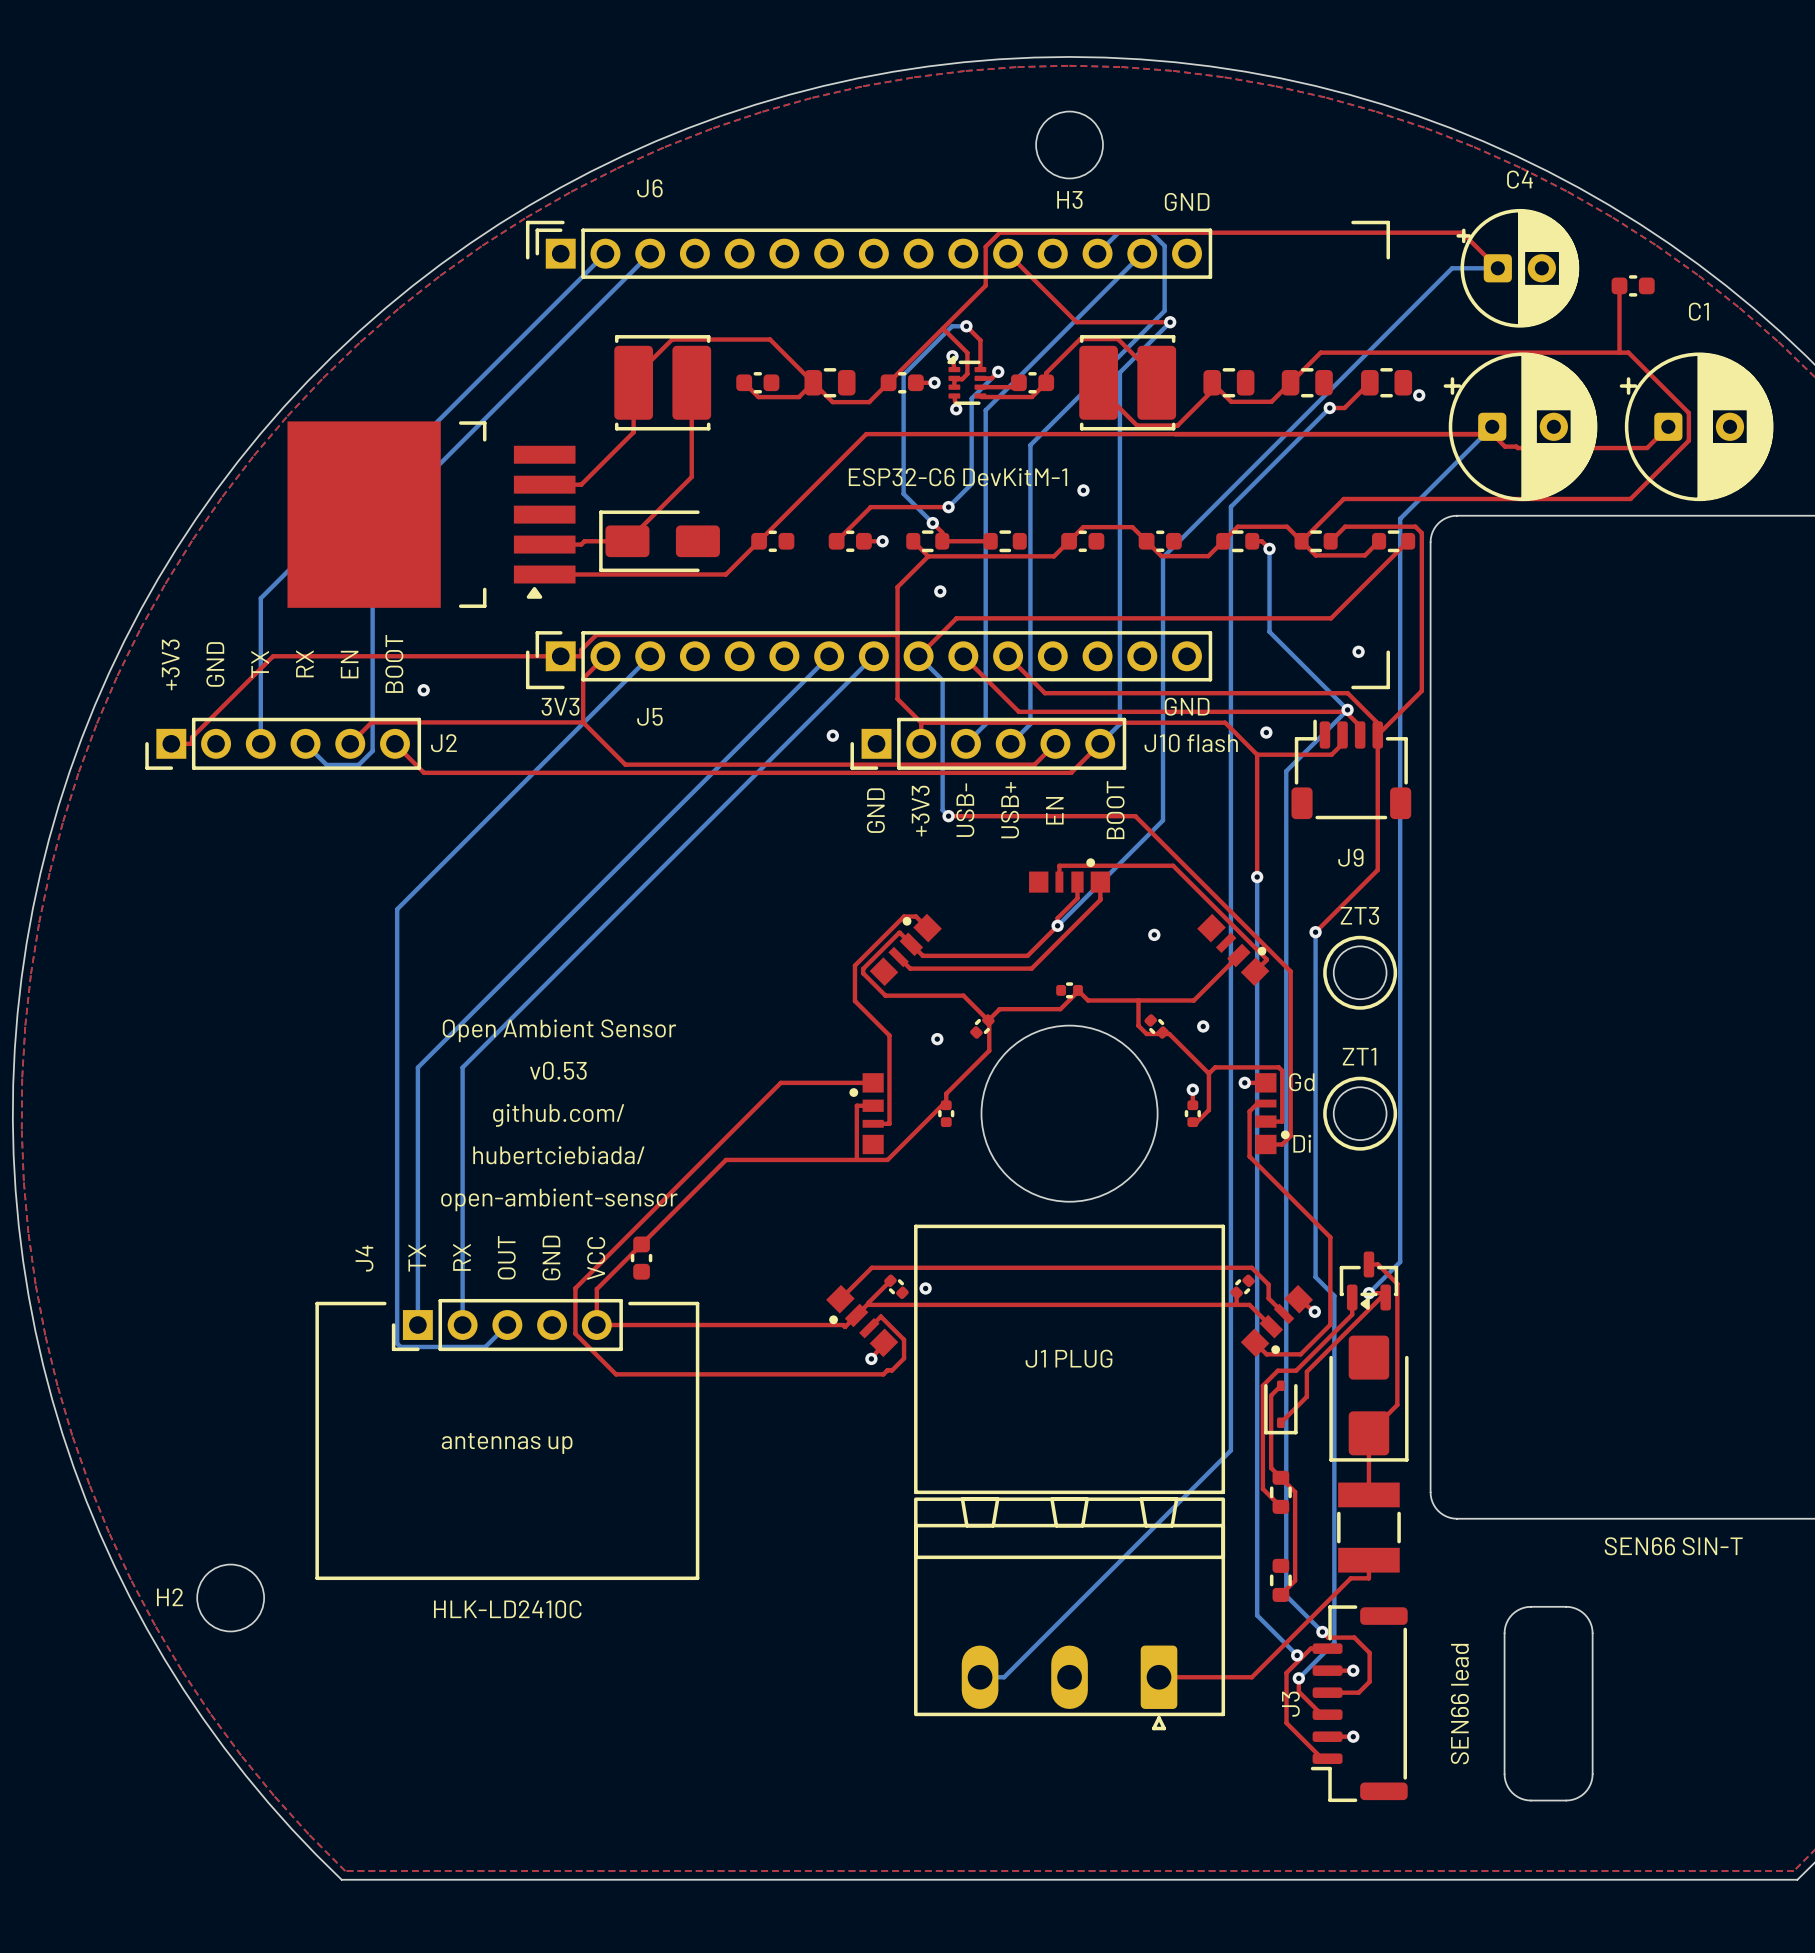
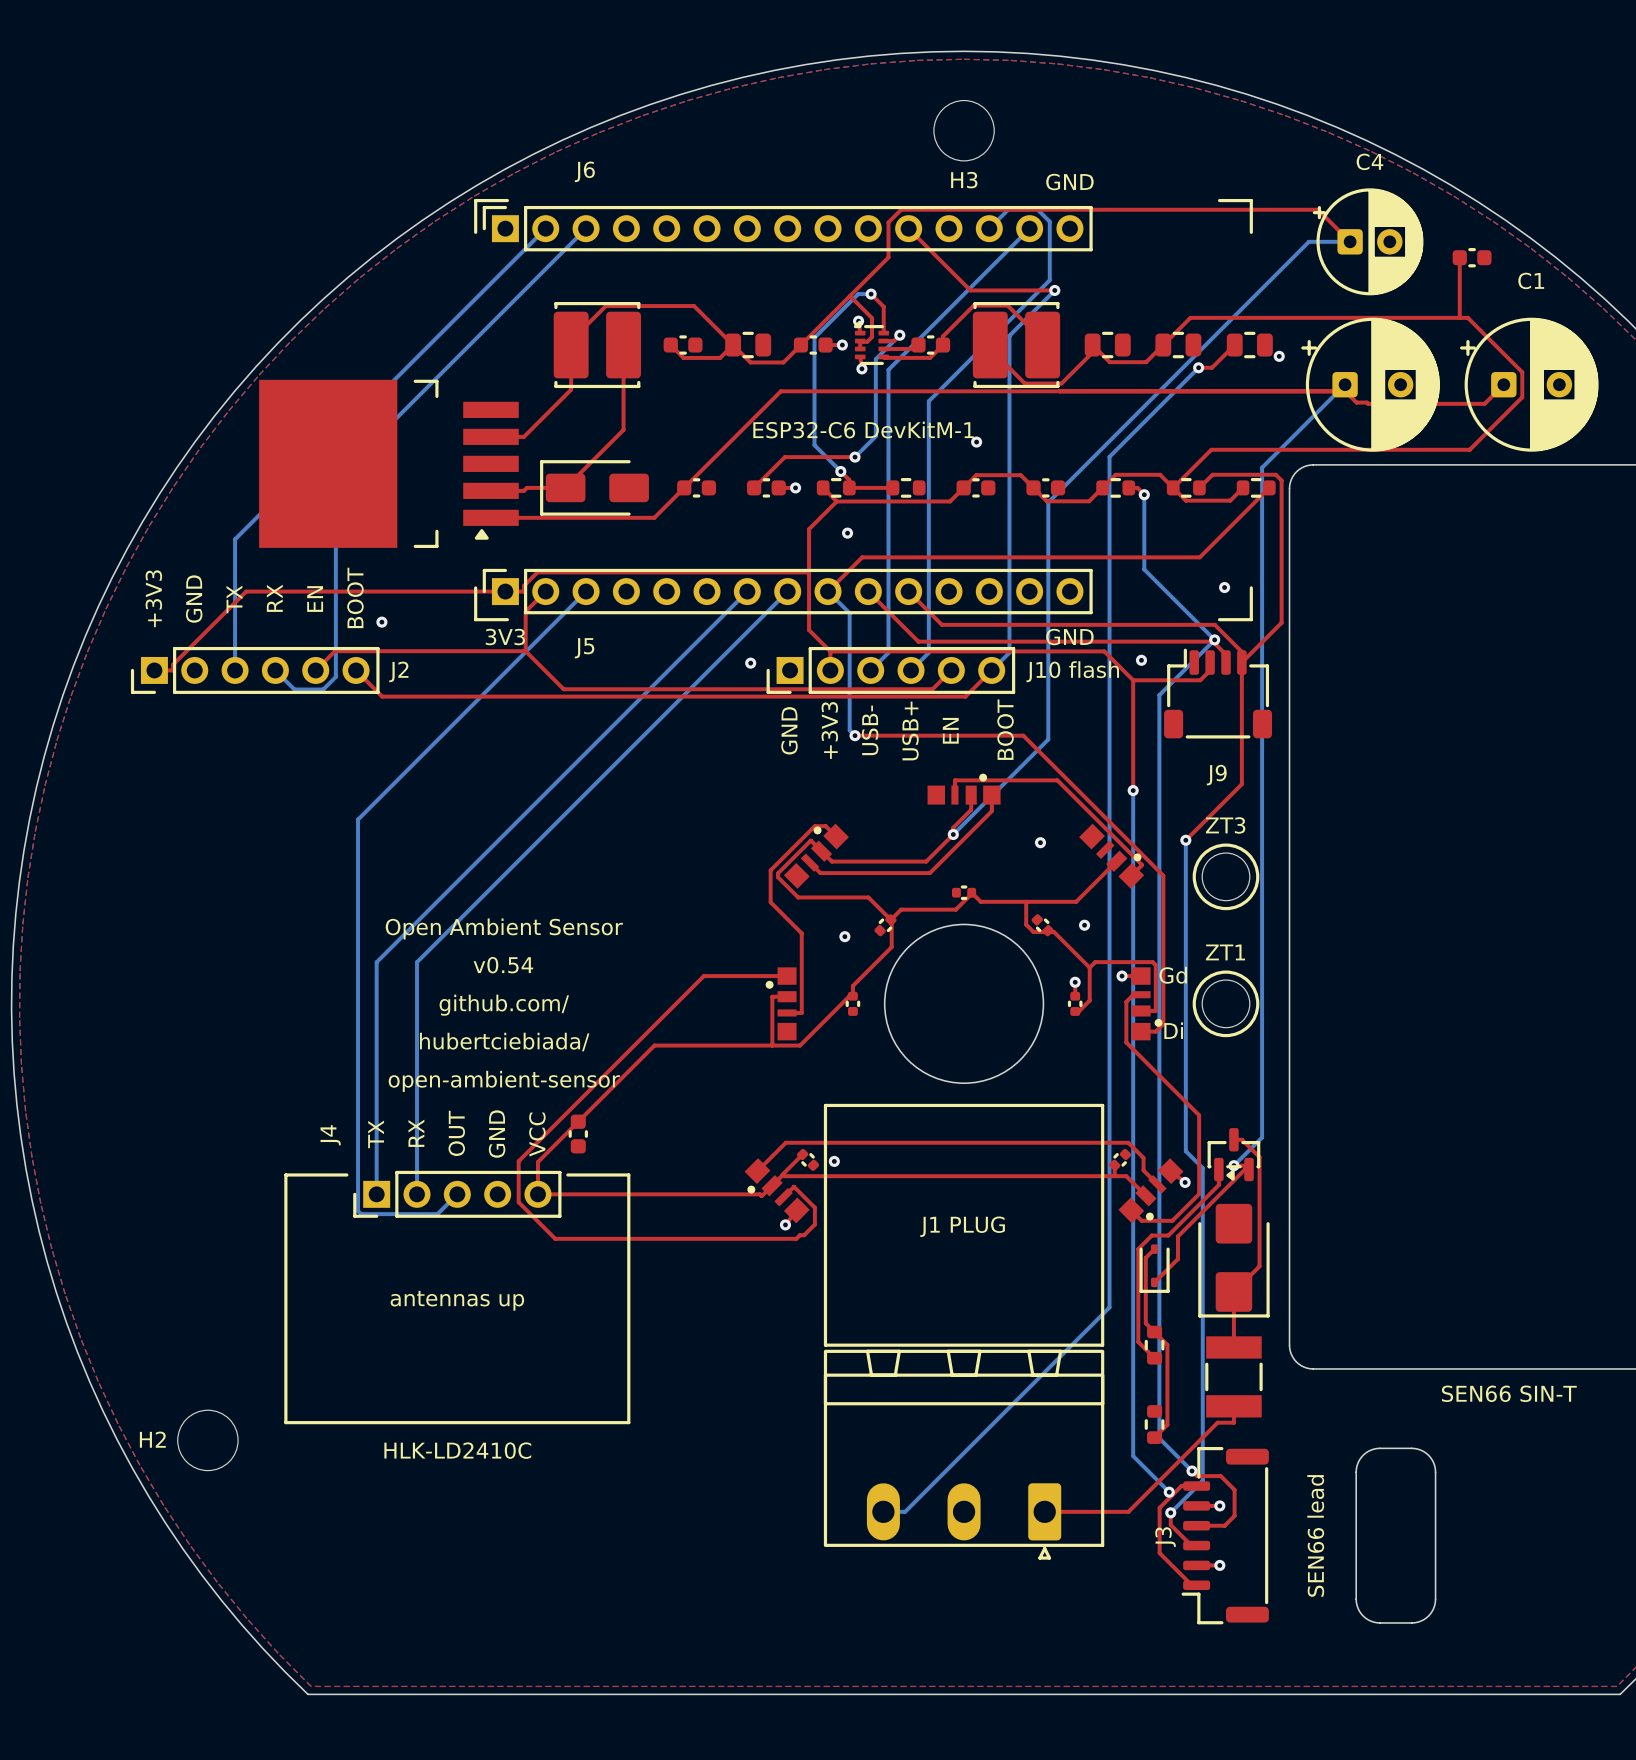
text: v0.53 (558, 1070) -> v0.54 (503, 965)

